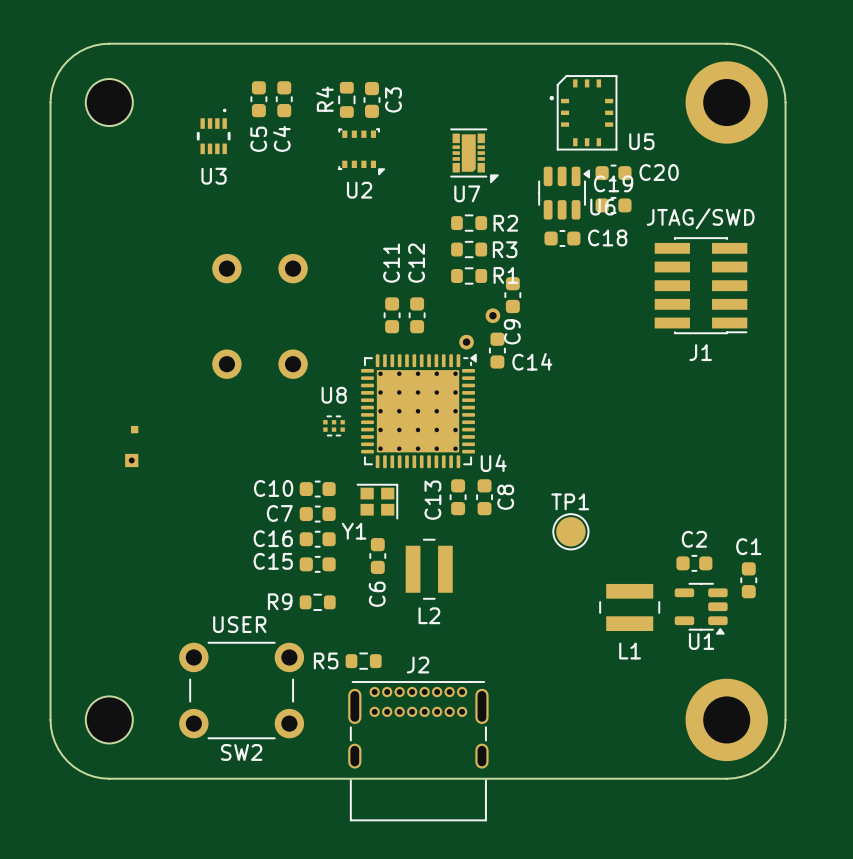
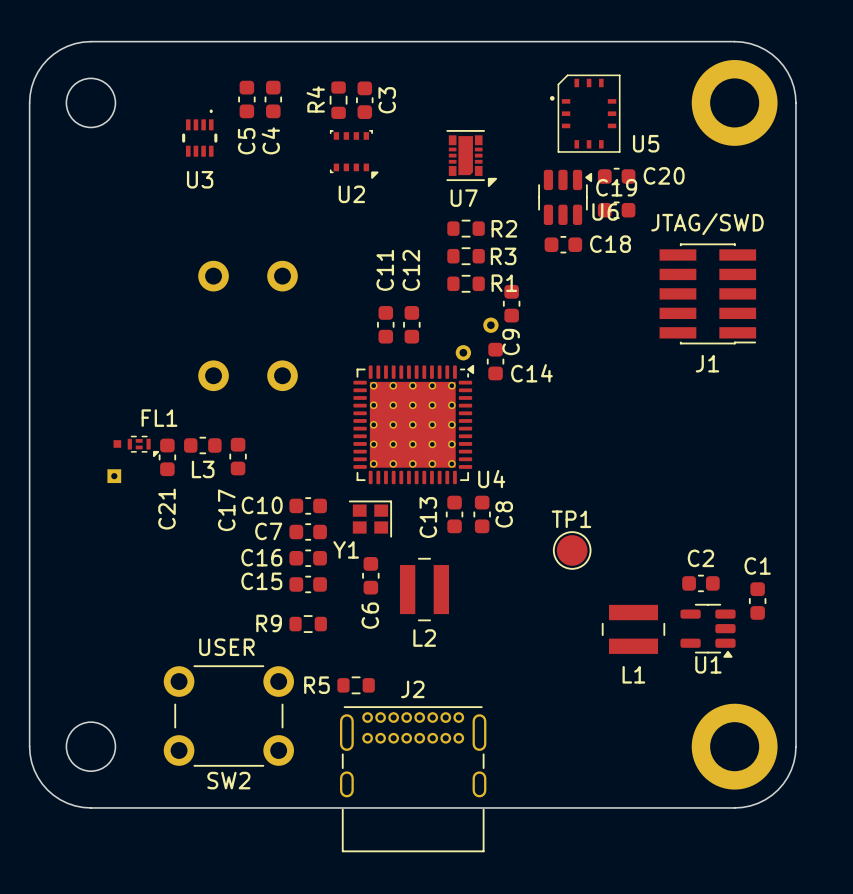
U8: (334, 425) -> none
FL1: none -> (143, 446)
L3: none -> (202, 445)
C17: none -> (238, 456)
C21: none -> (167, 457)

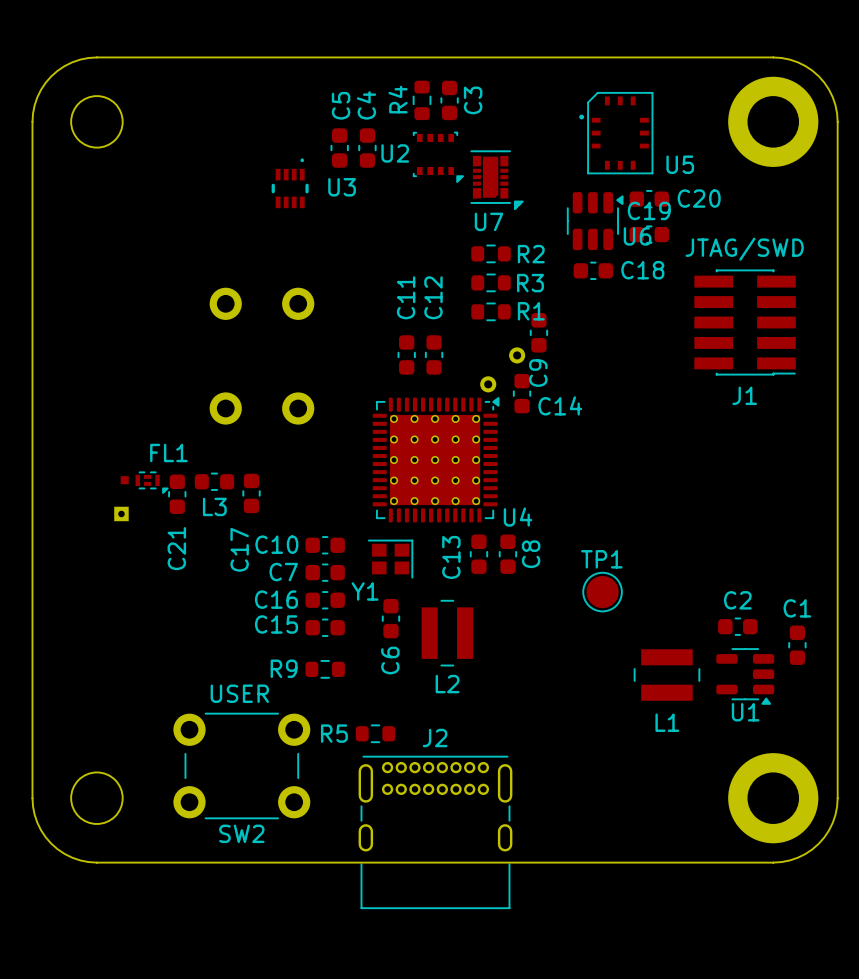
C5 position: (246, 99) -> (339, 148)
C4 position: (273, 99) -> (367, 148)
R4 position: (338, 100) -> (422, 100)
C3 position: (364, 100) -> (449, 100)
U3 position: (199, 133) -> (290, 183)
C4 name position: C4 (270, 140) -> C4 (366, 105)
C5 name position: C5 (246, 141) -> C5 (341, 105)
U2 position: (354, 154) -> (438, 157)
U3 name position: U3 (200, 179) -> U3 (342, 187)
U2 name position: U2 (351, 194) -> U2 (395, 153)

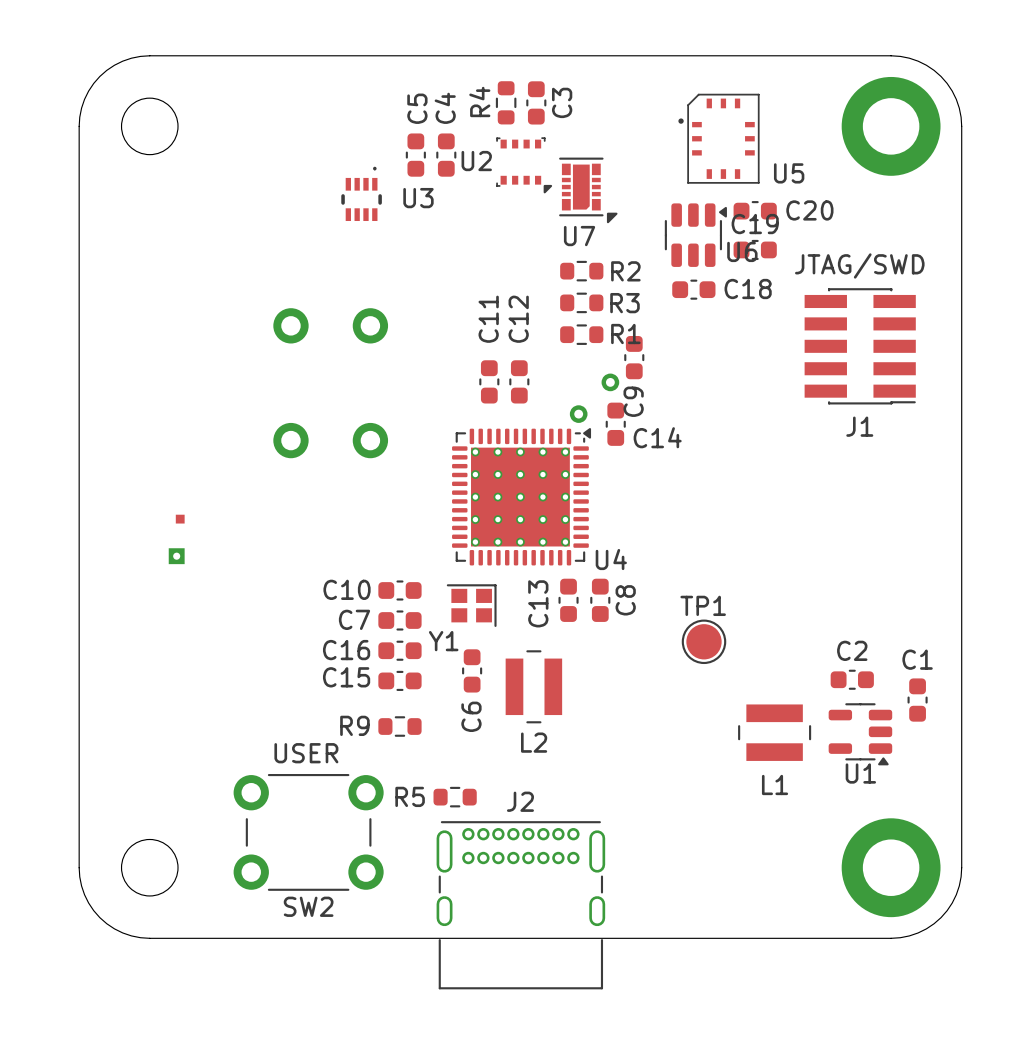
L3: (214, 481) -> none
FL1: (152, 482) -> none
C17: (251, 493) -> none
C21: (177, 494) -> none

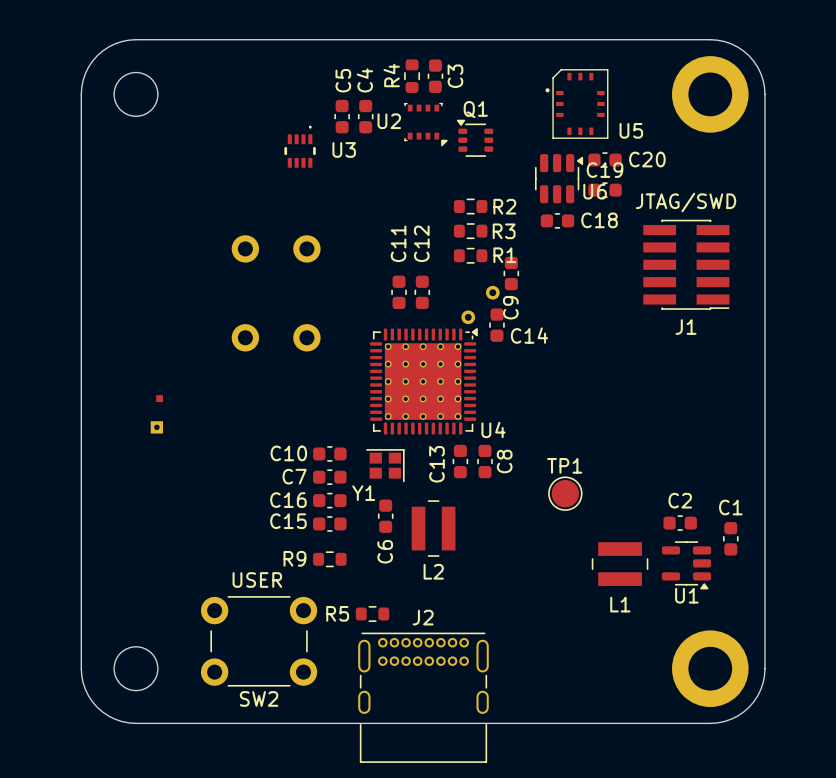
Q1: none -> (475, 138)
U7: (588, 190) -> none

